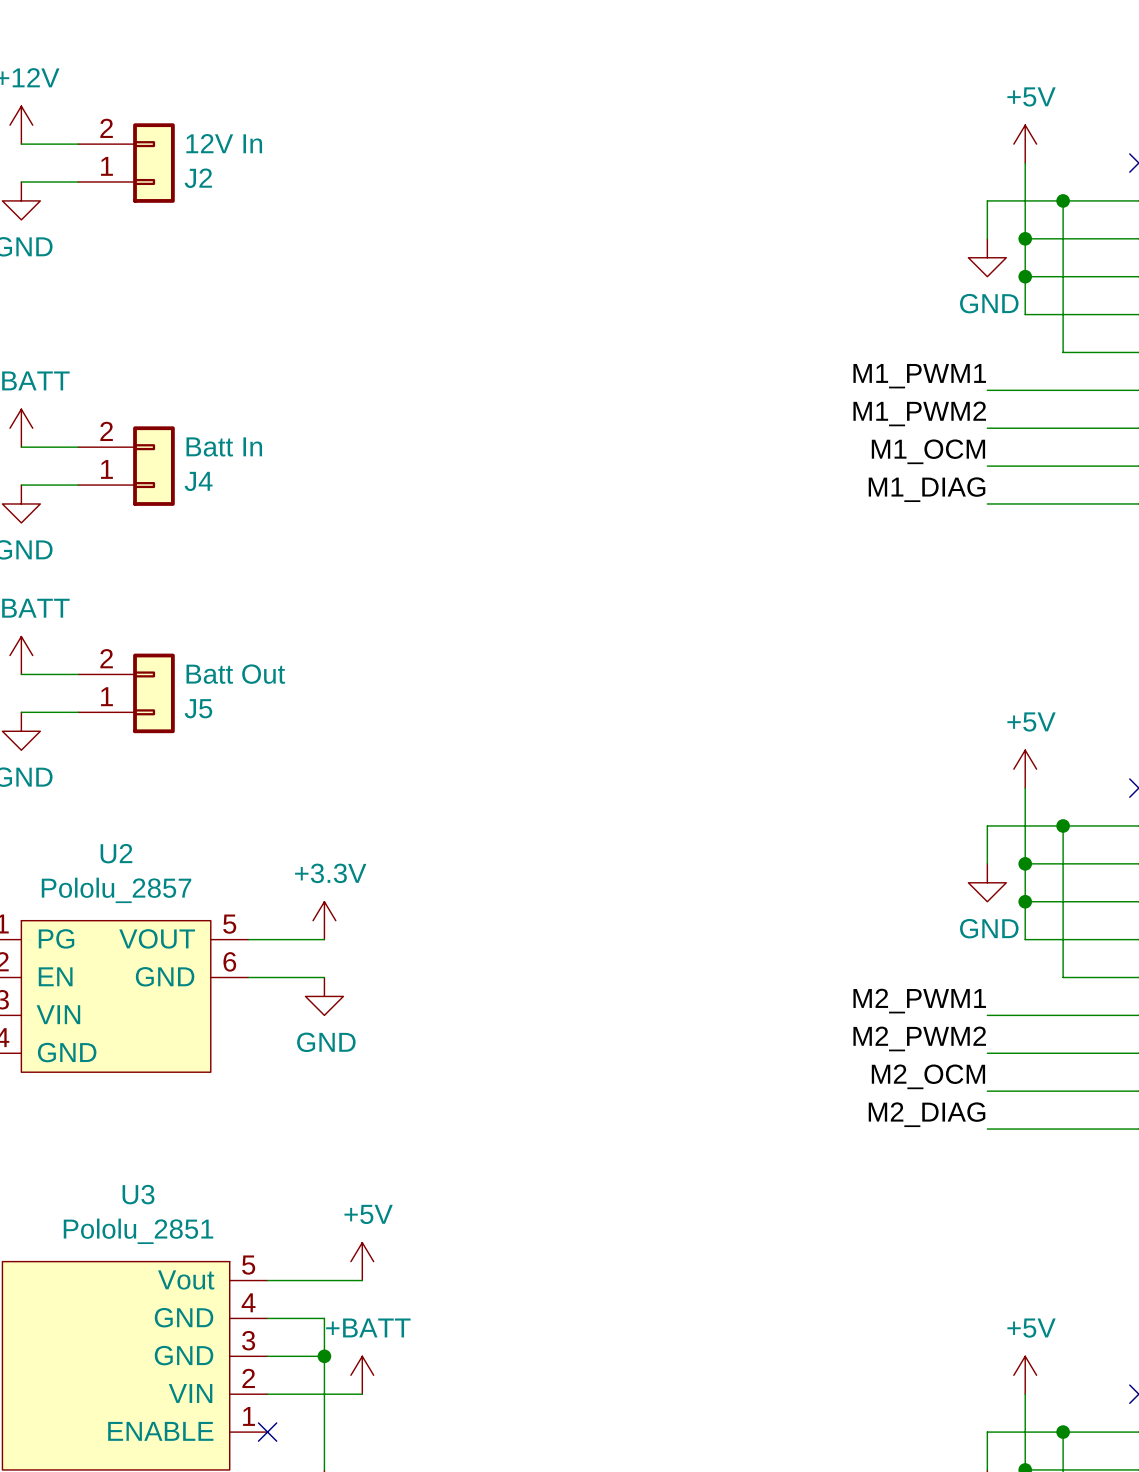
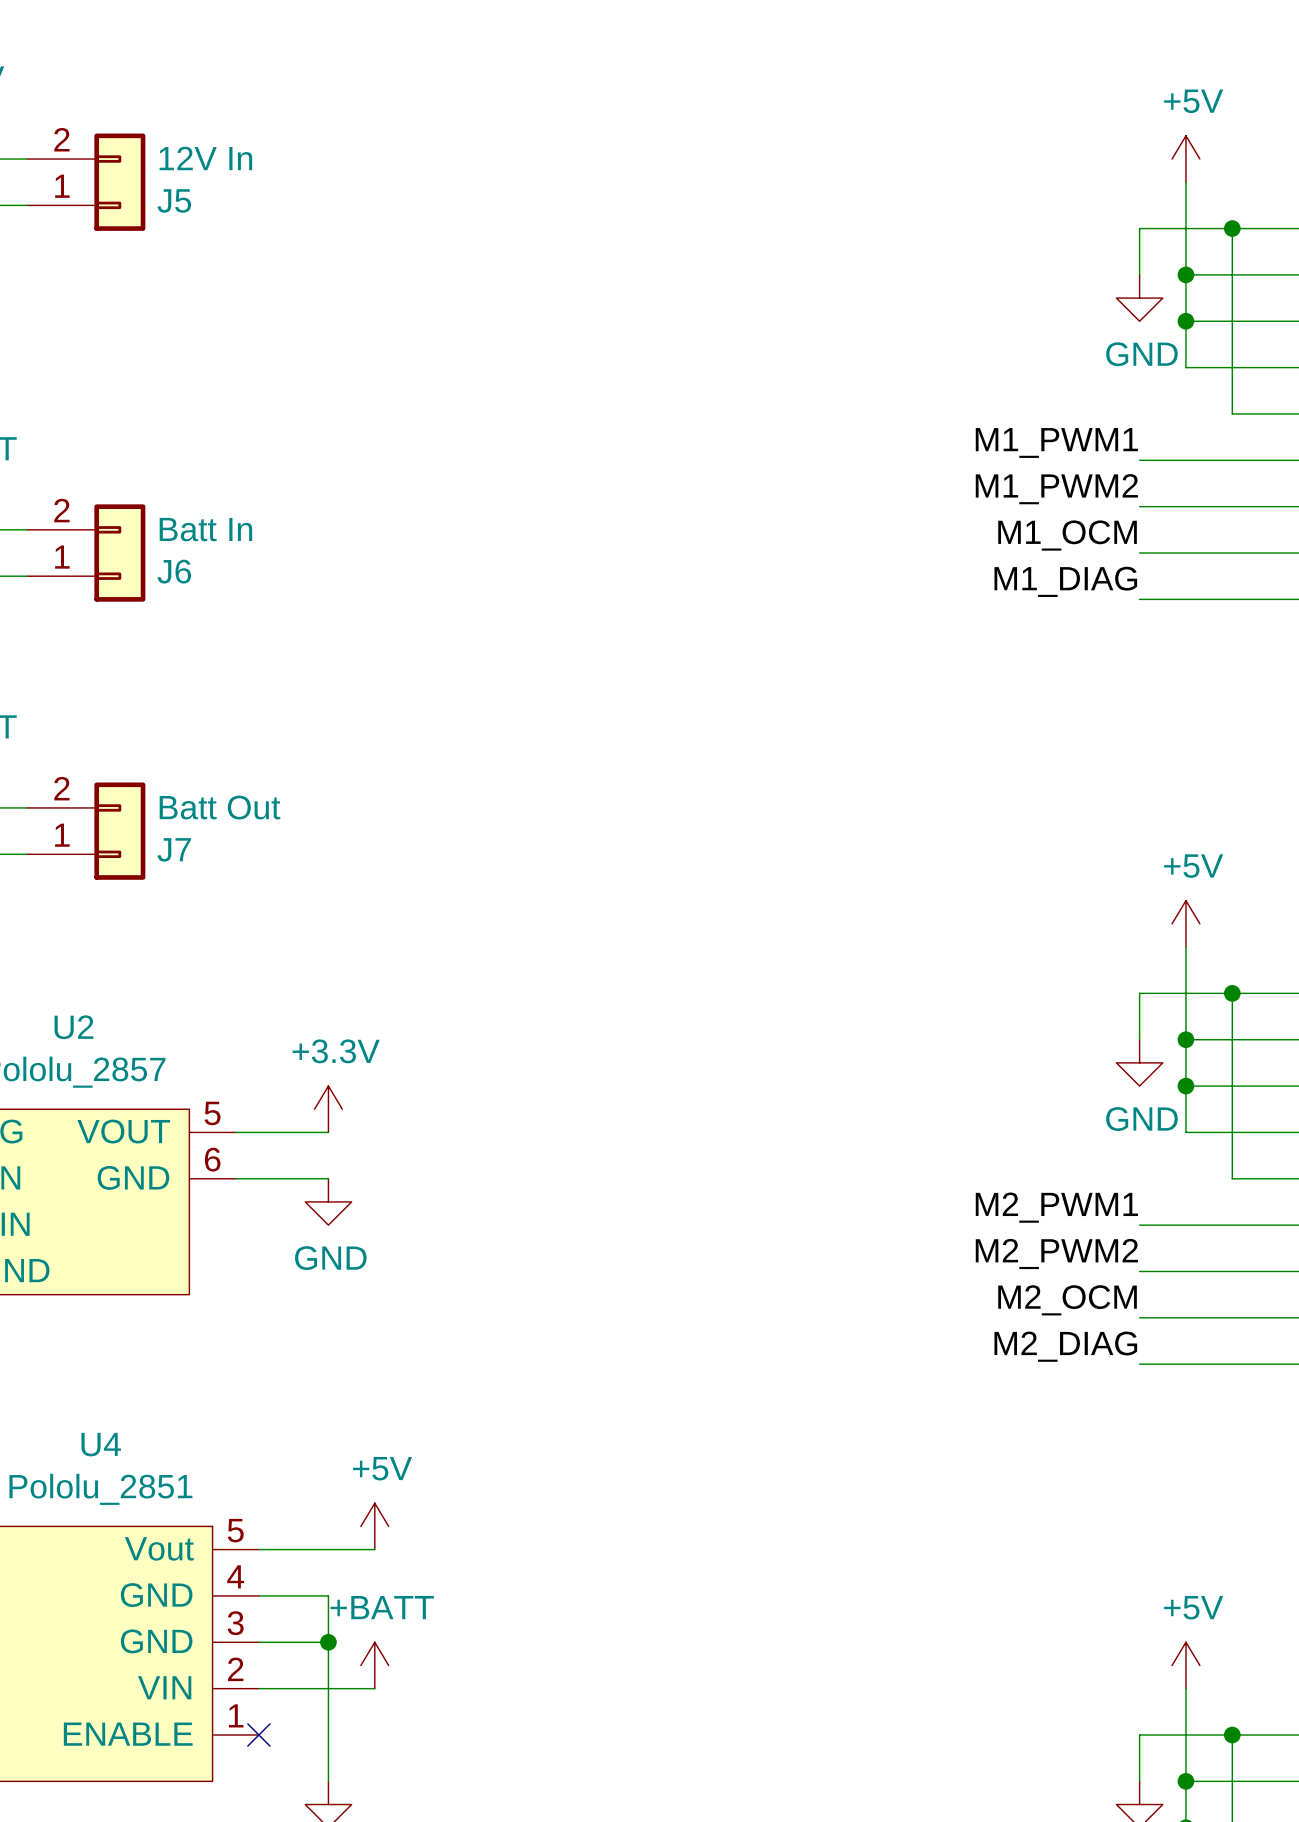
J2 name: J2 (198, 178) -> J5 (174, 200)
J4 name: J4 (198, 481) -> J6 (174, 571)
J5 name: J5 (198, 708) -> J7 (174, 849)
U3 name: U3 (138, 1194) -> U4 (101, 1444)

